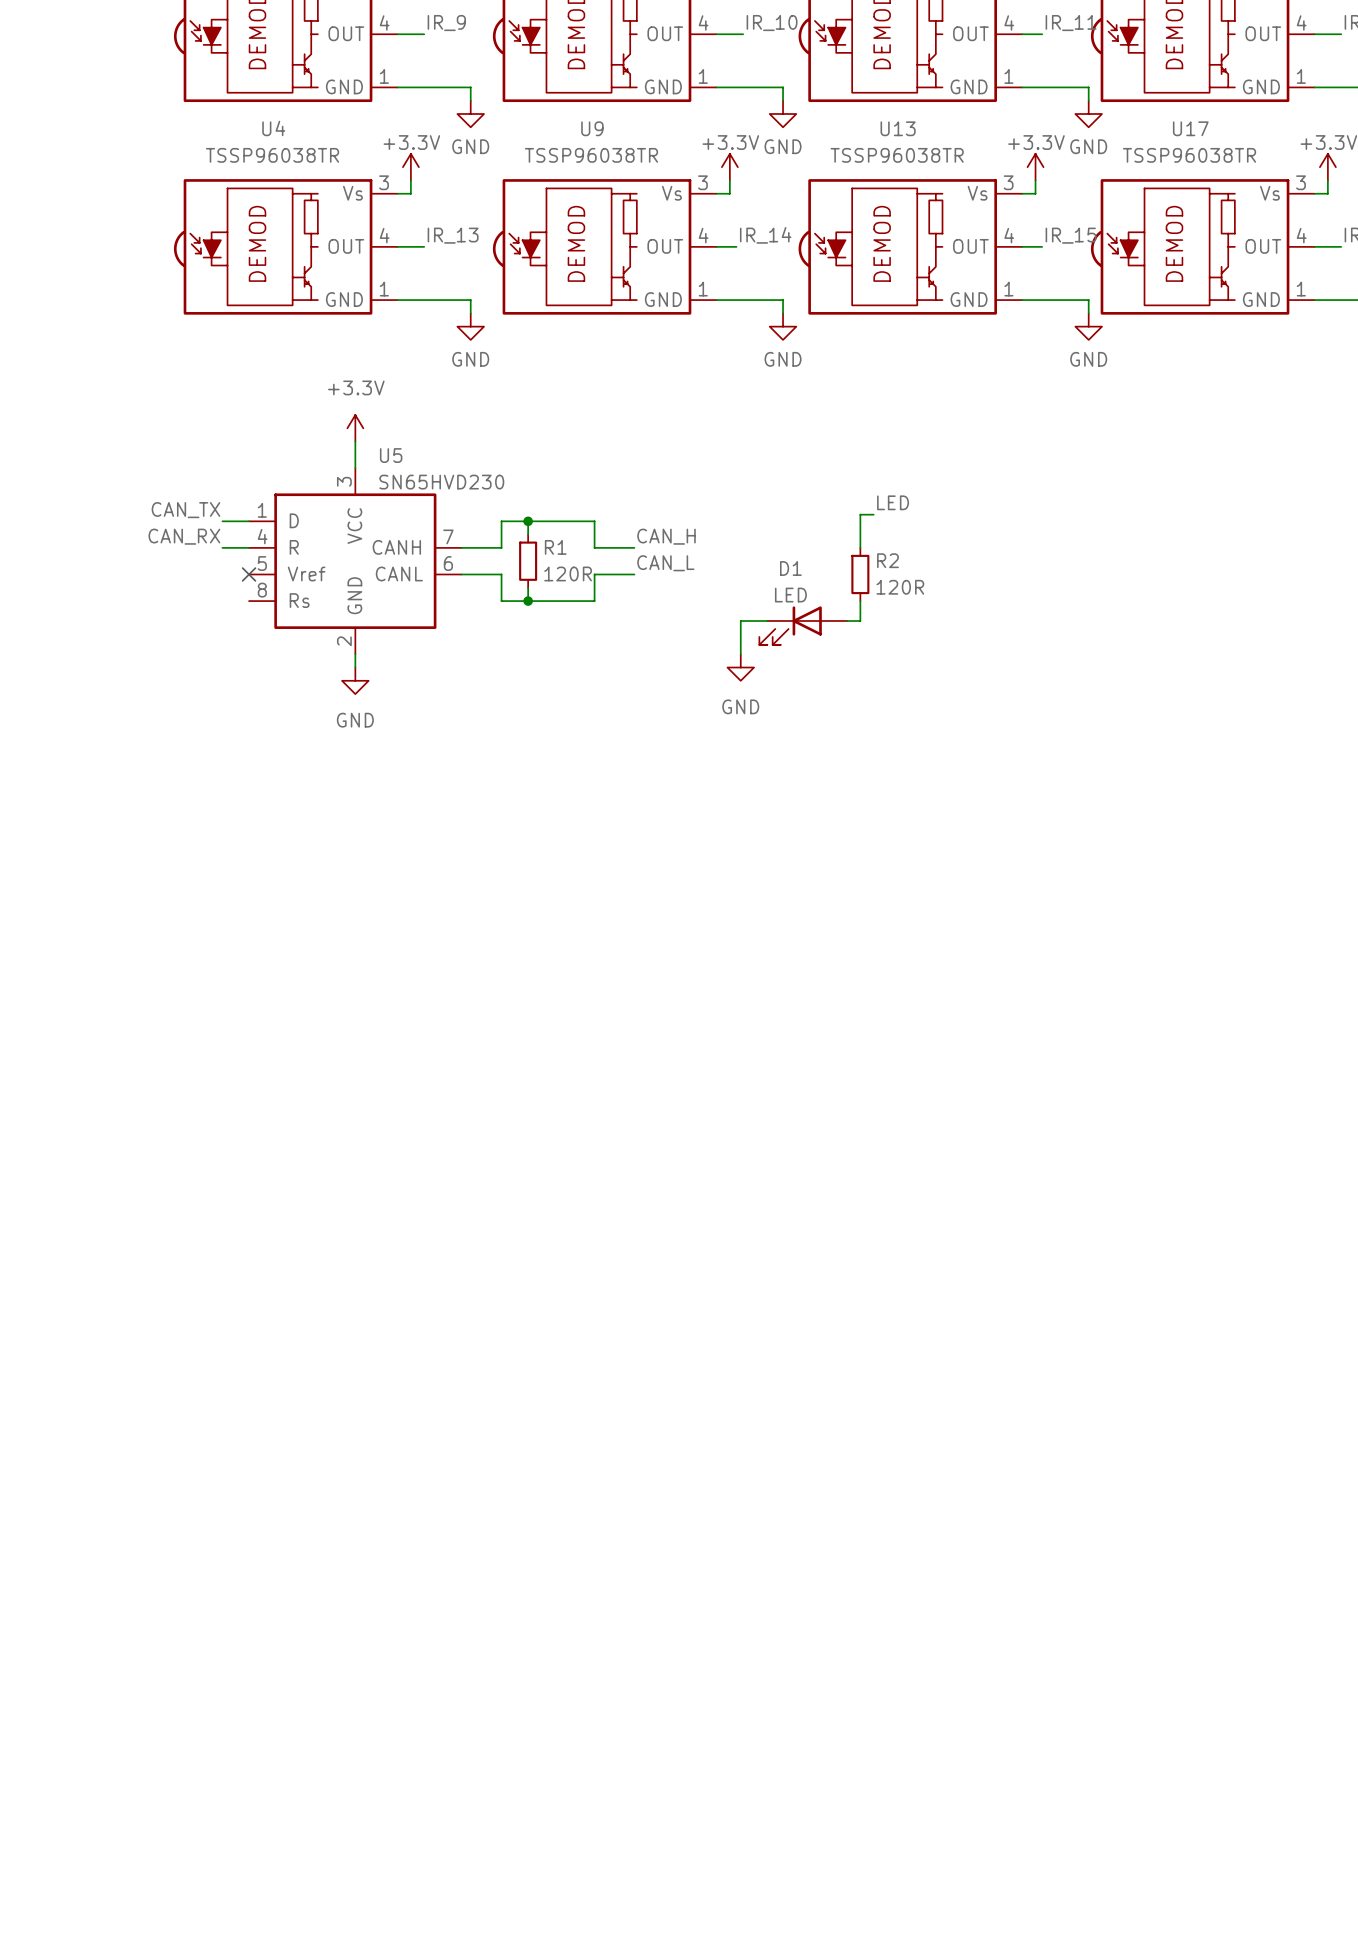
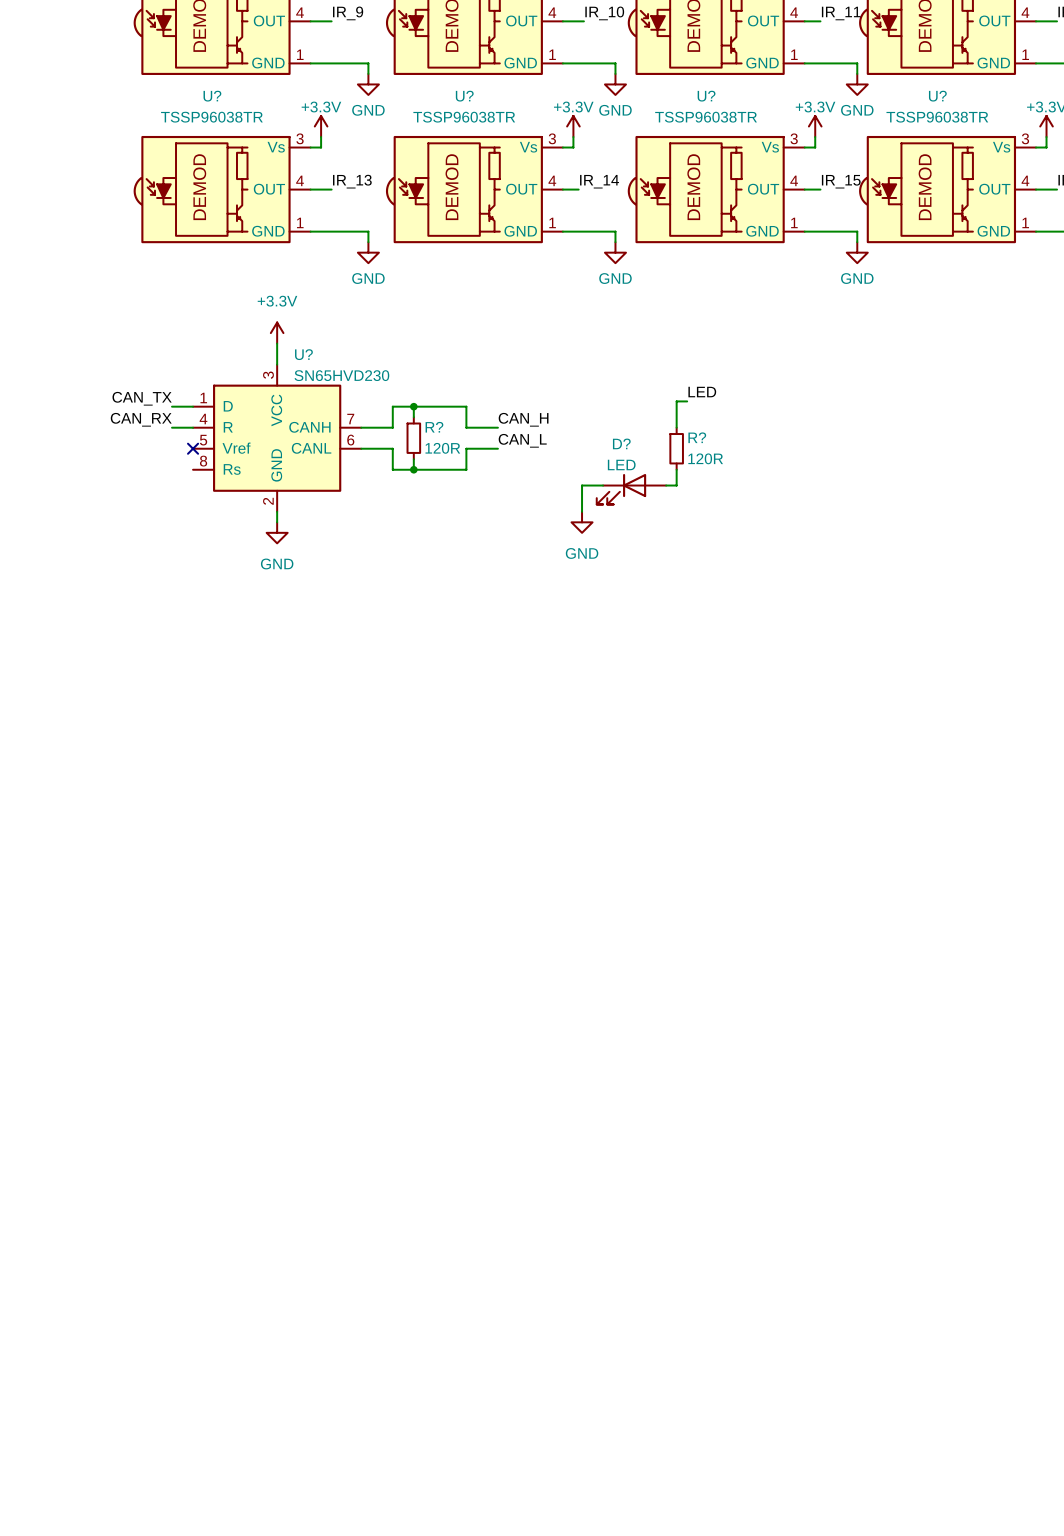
U4 name: U4 (273, 128) -> U? (212, 96)
U9 name: U9 (592, 128) -> U? (464, 96)
U13 name: U13 (898, 128) -> U? (706, 96)
U17 name: U17 (1190, 128) -> U? (937, 96)
U5 name: U5 (391, 455) -> U? (303, 354)
R1 name: R1 (555, 547) -> R? (434, 427)
R2 name: R2 (887, 560) -> R? (697, 437)
D1 name: D1 (790, 568) -> D? (621, 443)

